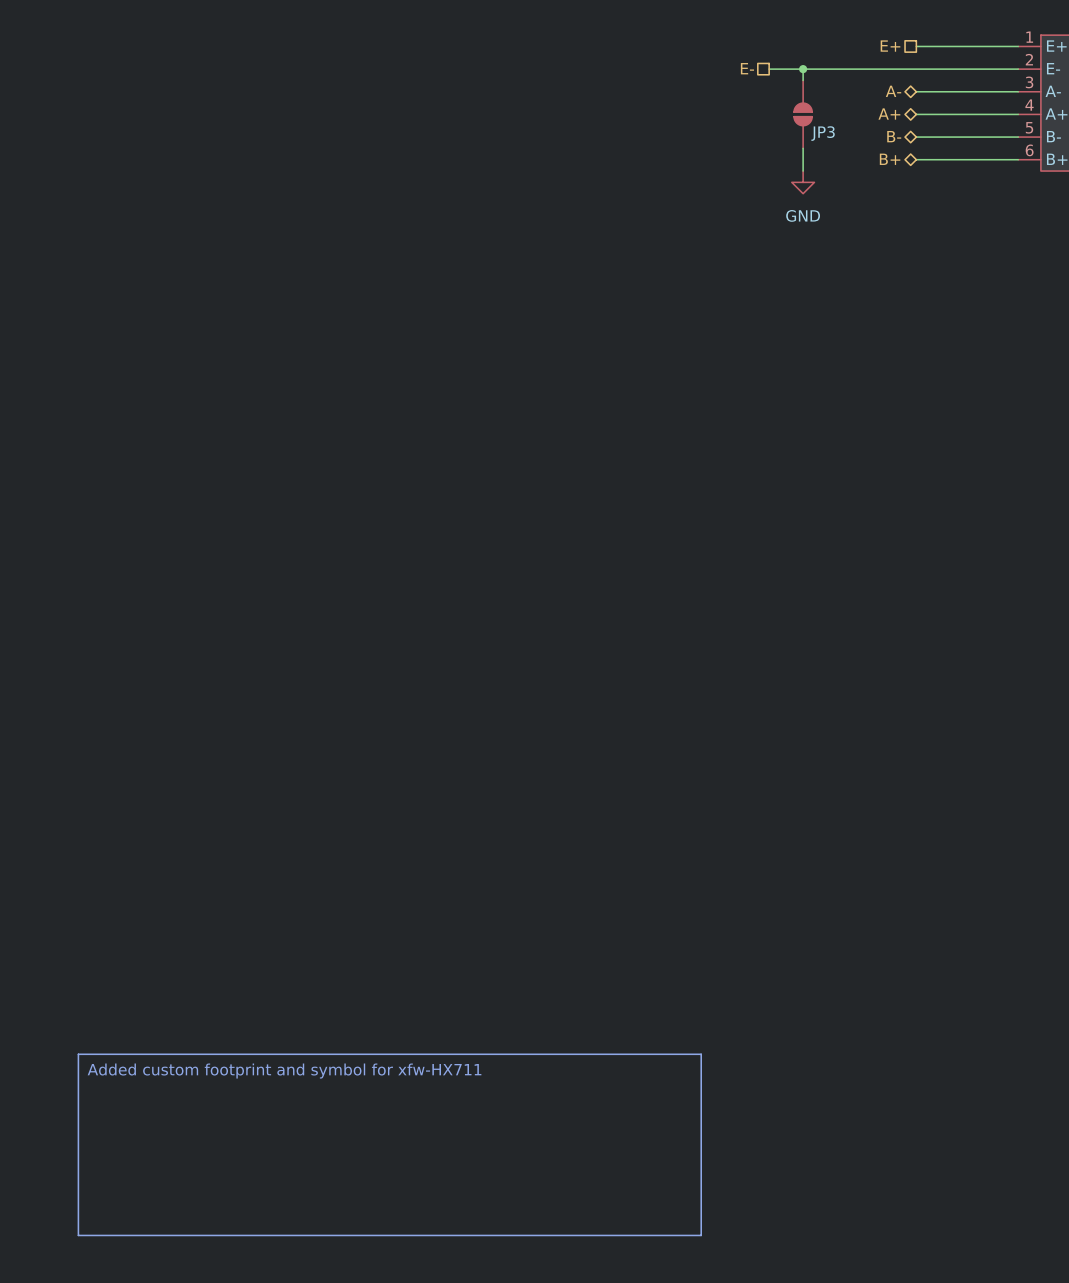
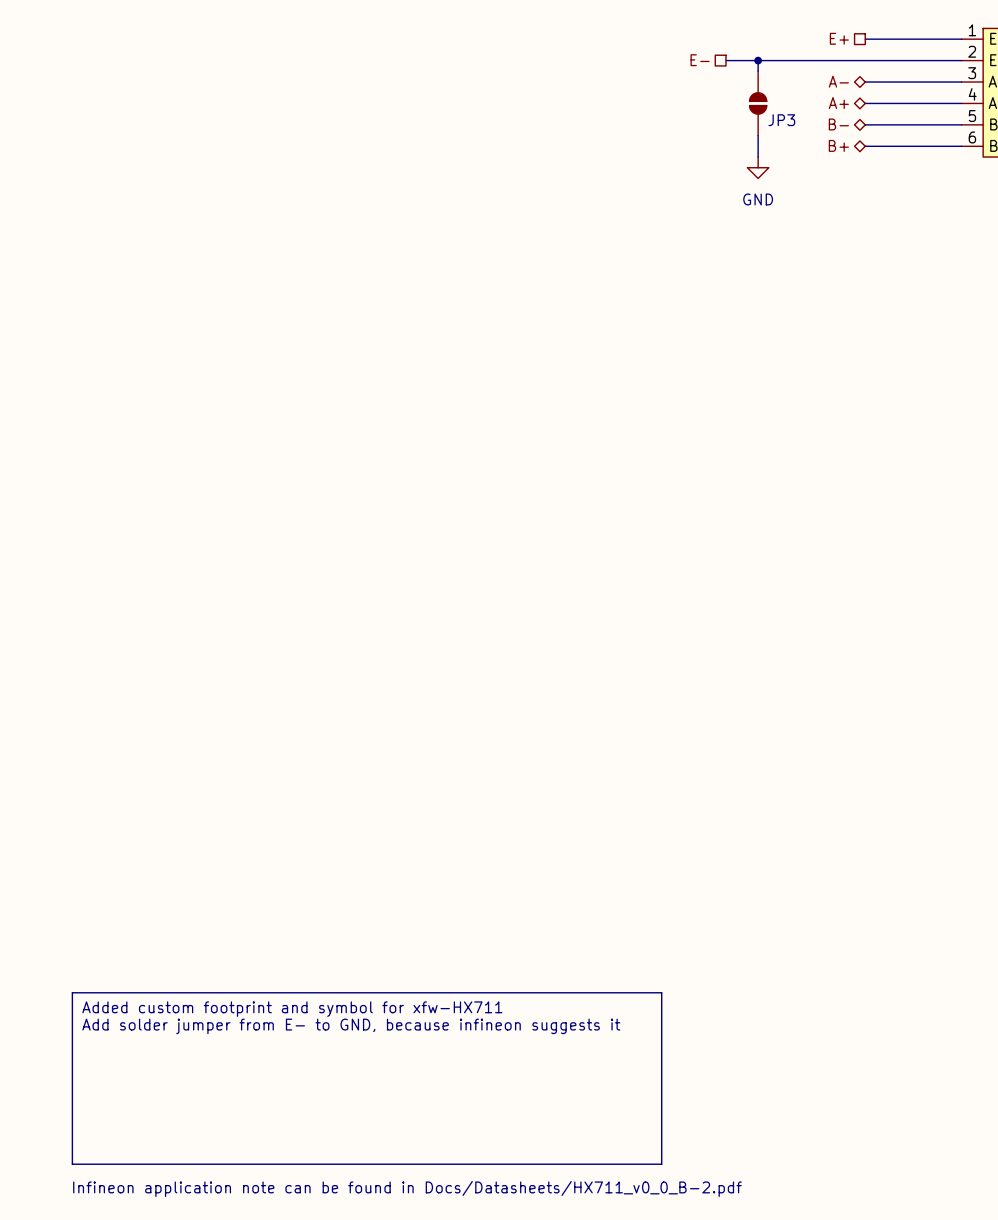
text: none -> Add solder jumper from E- to GND, because infineon suggests it (351, 1026)
text: none -> Infineon application note can be found in Docs/Datasheets/HX711_v0_0_B-2.pdf (407, 1188)

